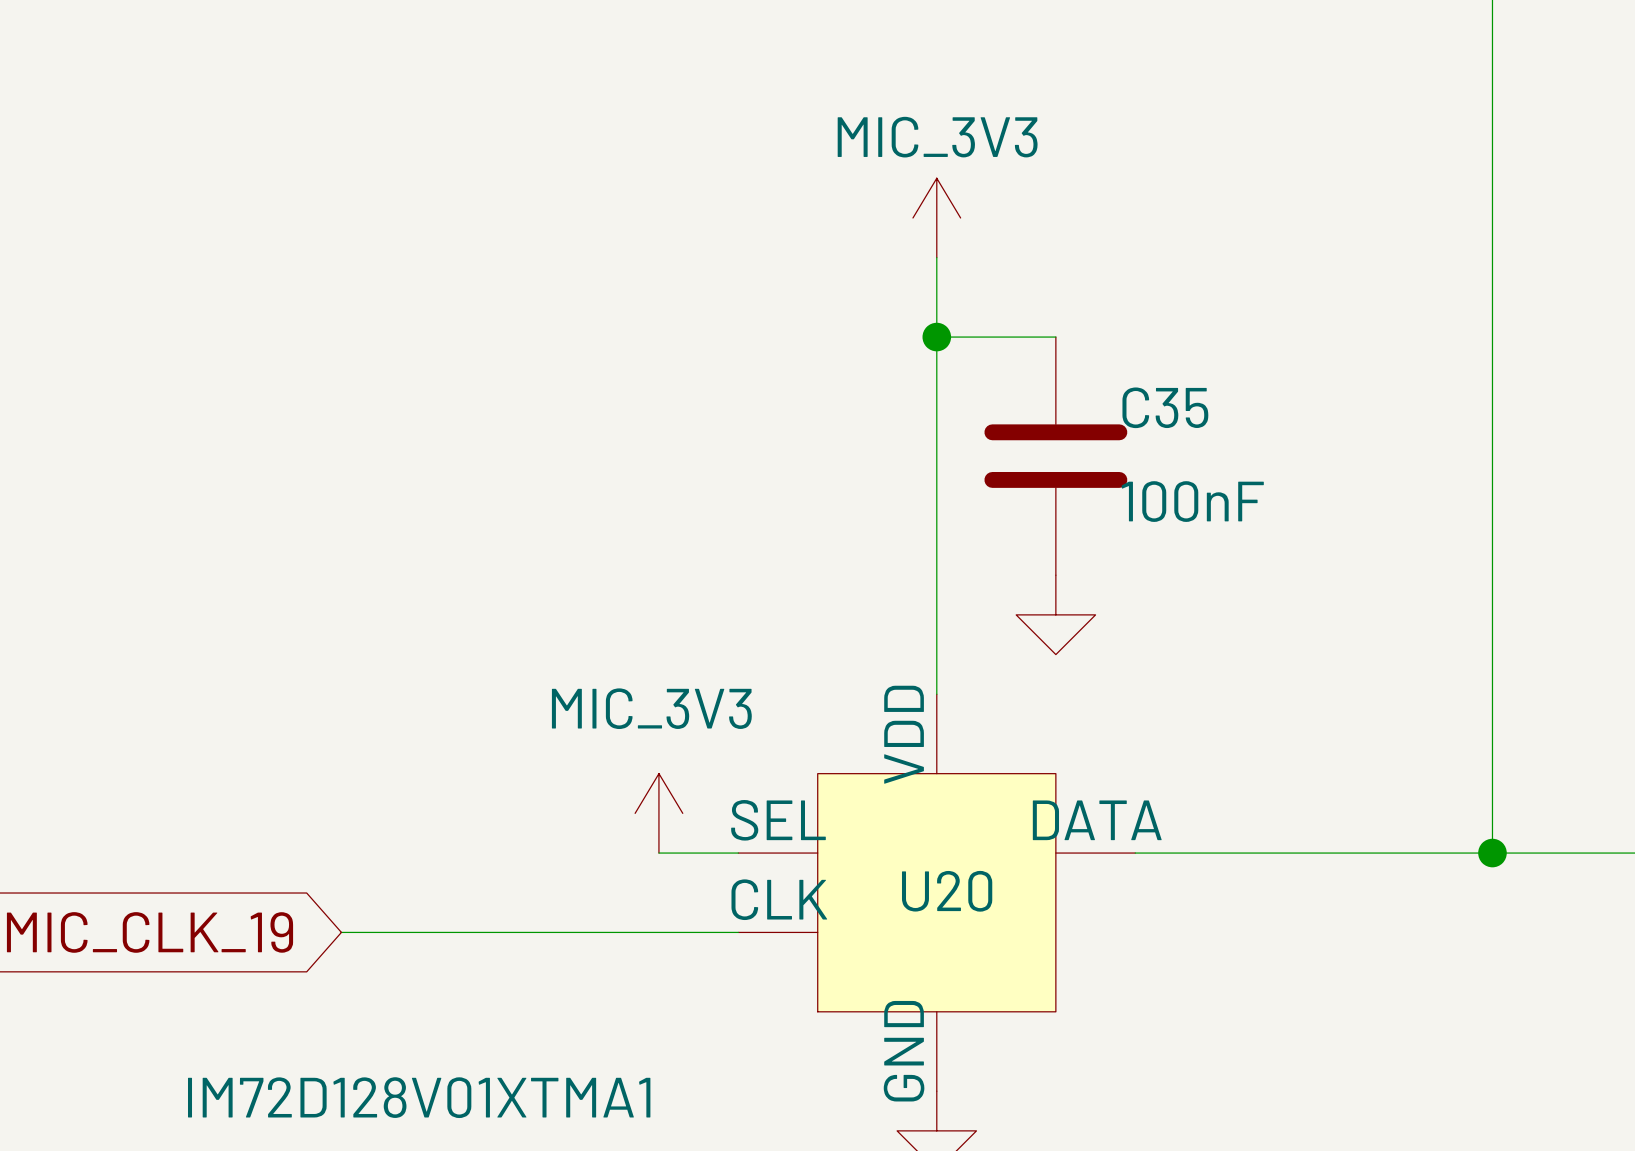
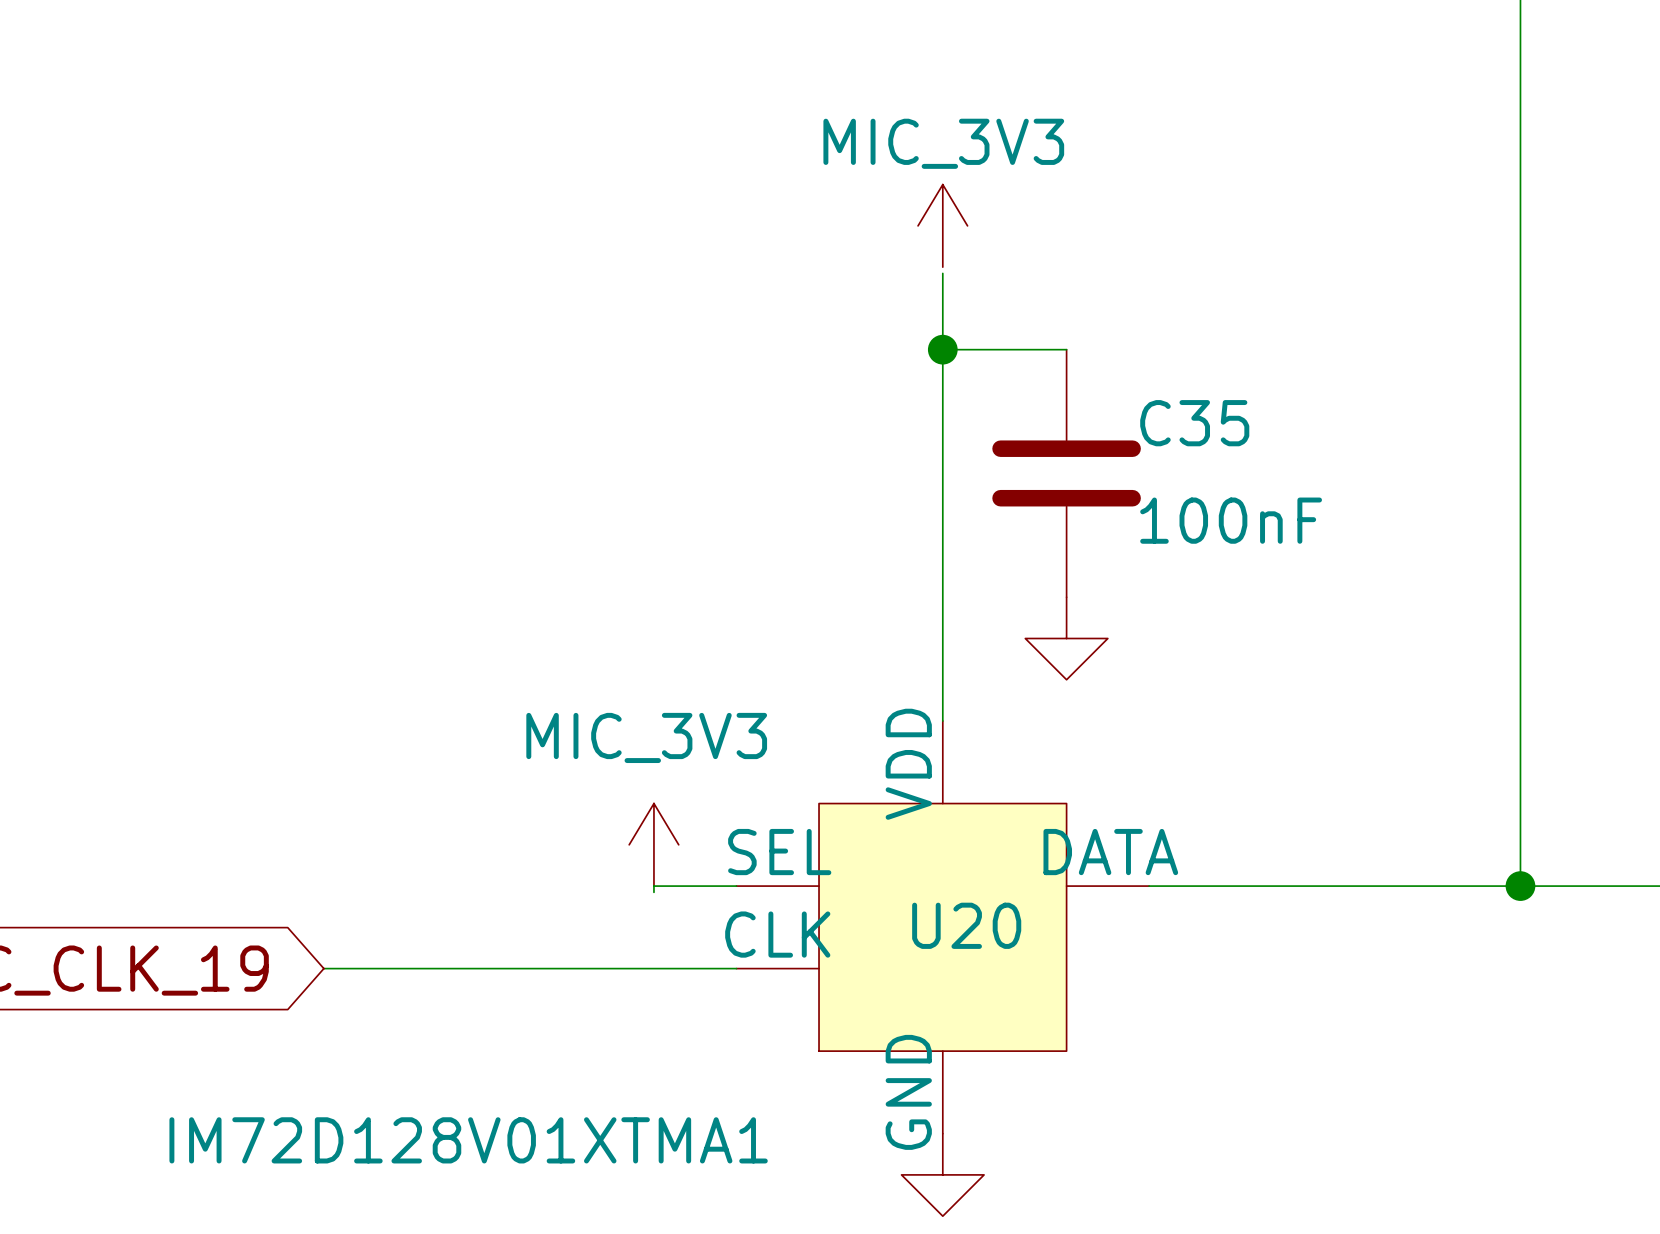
wire: (936, 257) (936, 263) -> (653, 886) (653, 892)

